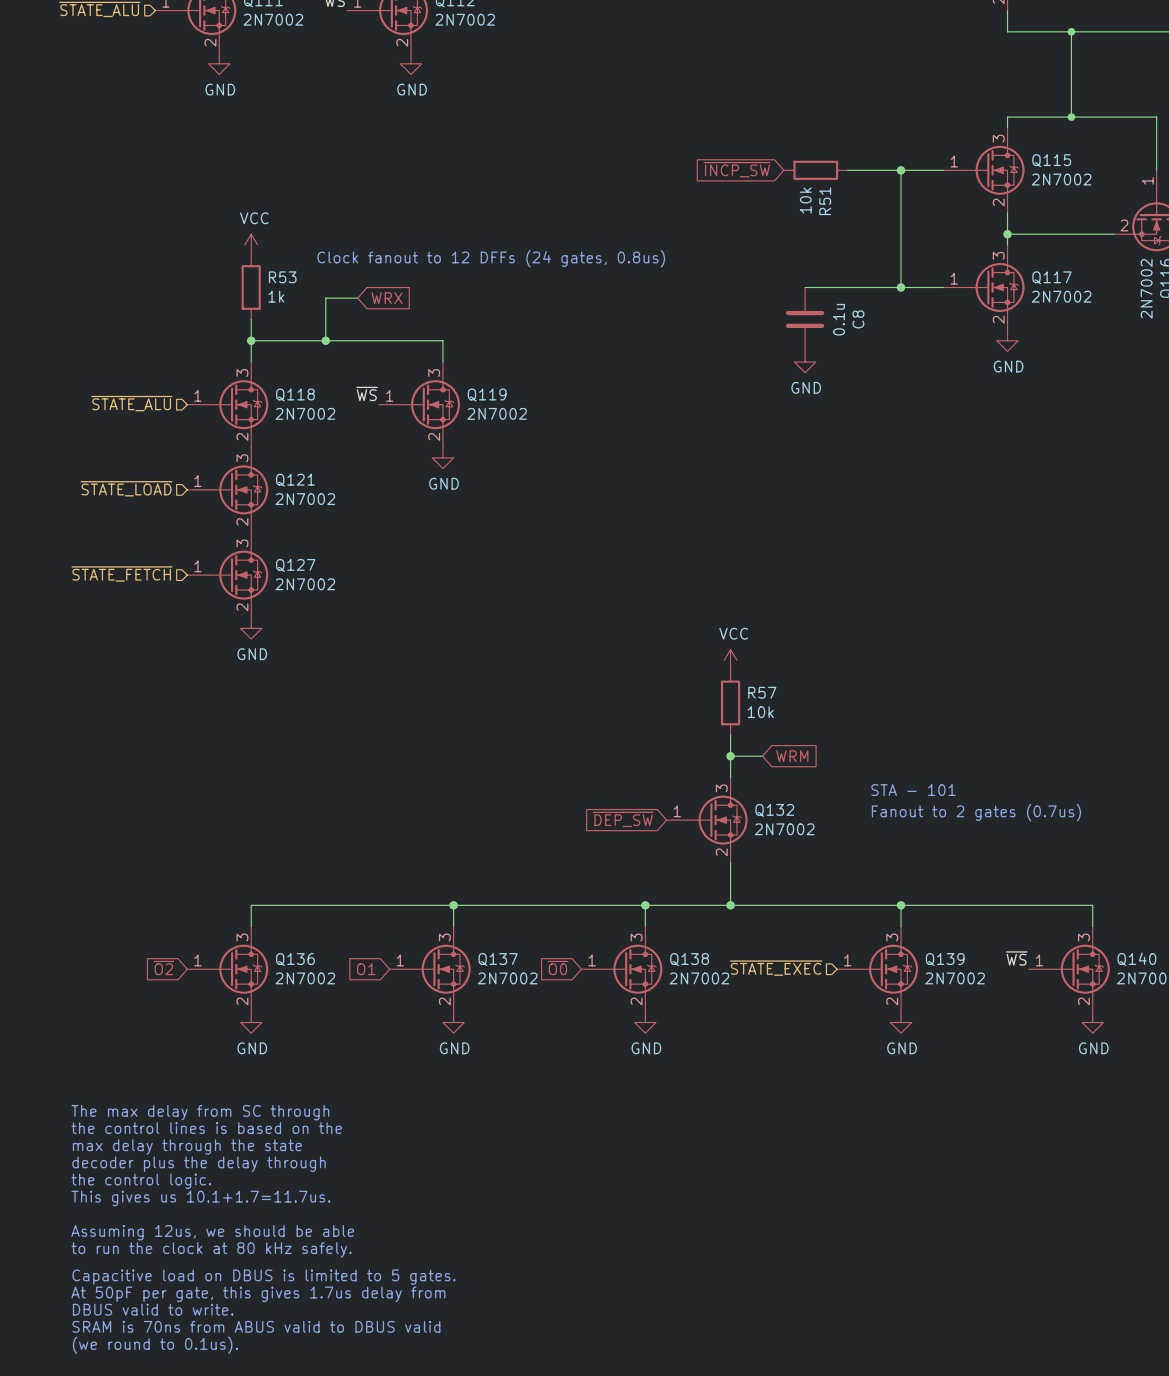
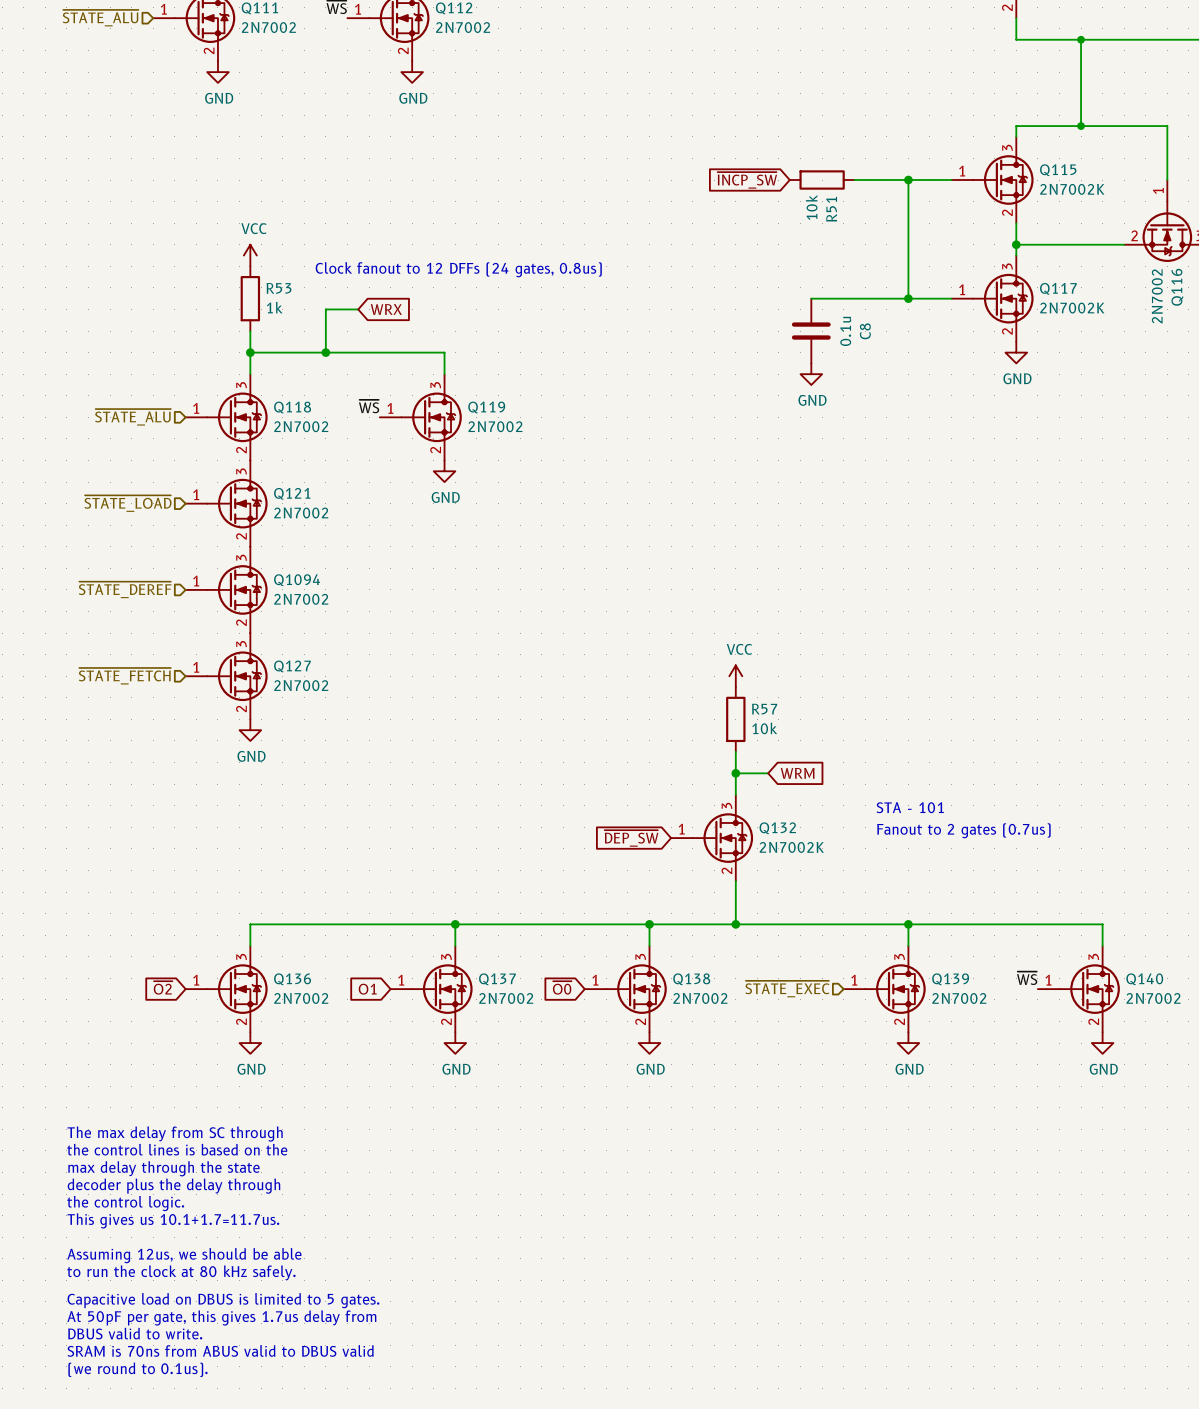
Q115 value: 2N7002 (1061, 179) -> 2N7002K (1072, 189)
Q117 value: 2N7002 (1061, 296) -> 2N7002K (1072, 308)
Q127 name: Q127 (295, 565) -> Q1094 (297, 580)
hierarchical label: ~{STATE_FETCH} (121, 573) -> ~{STATE_DEREF} (125, 589)
power symbol position: GND (251, 628) -> GND (250, 730)
hierarchical label: none -> ~{STATE_FETCH} (124, 676)
Q127: none -> 2N7002 (226, 676)
Q132 value: 2N7002 (784, 829) -> 2N7002K (791, 847)

